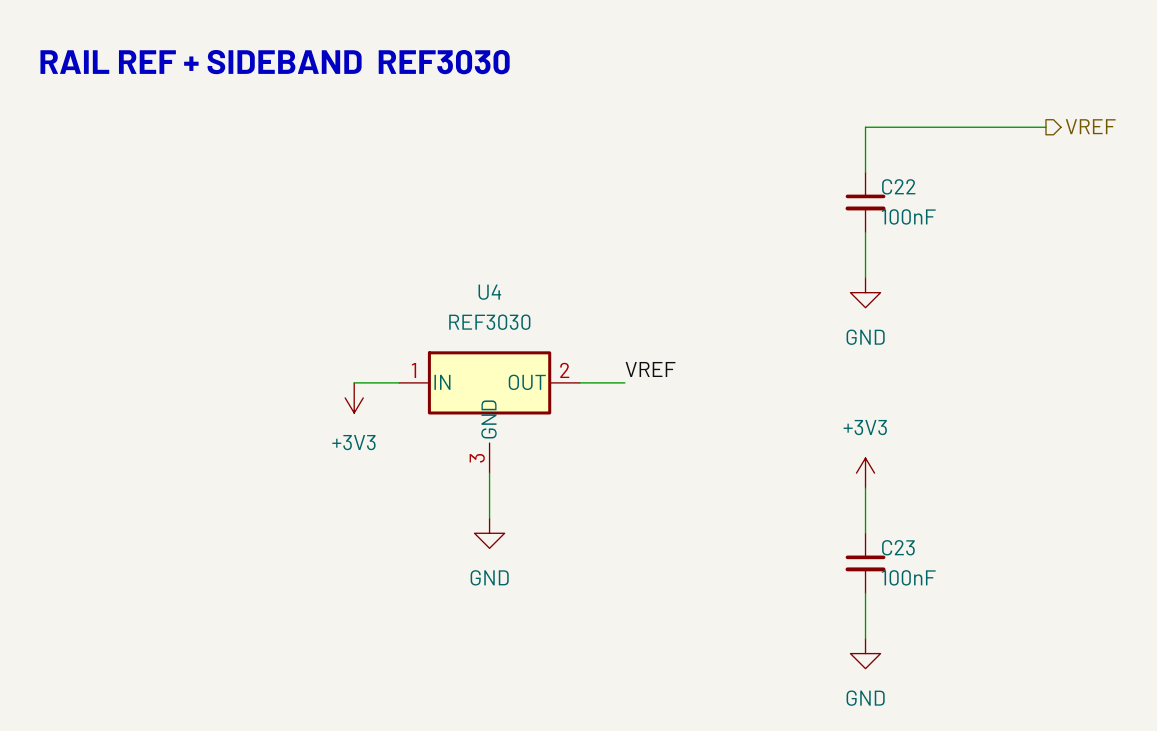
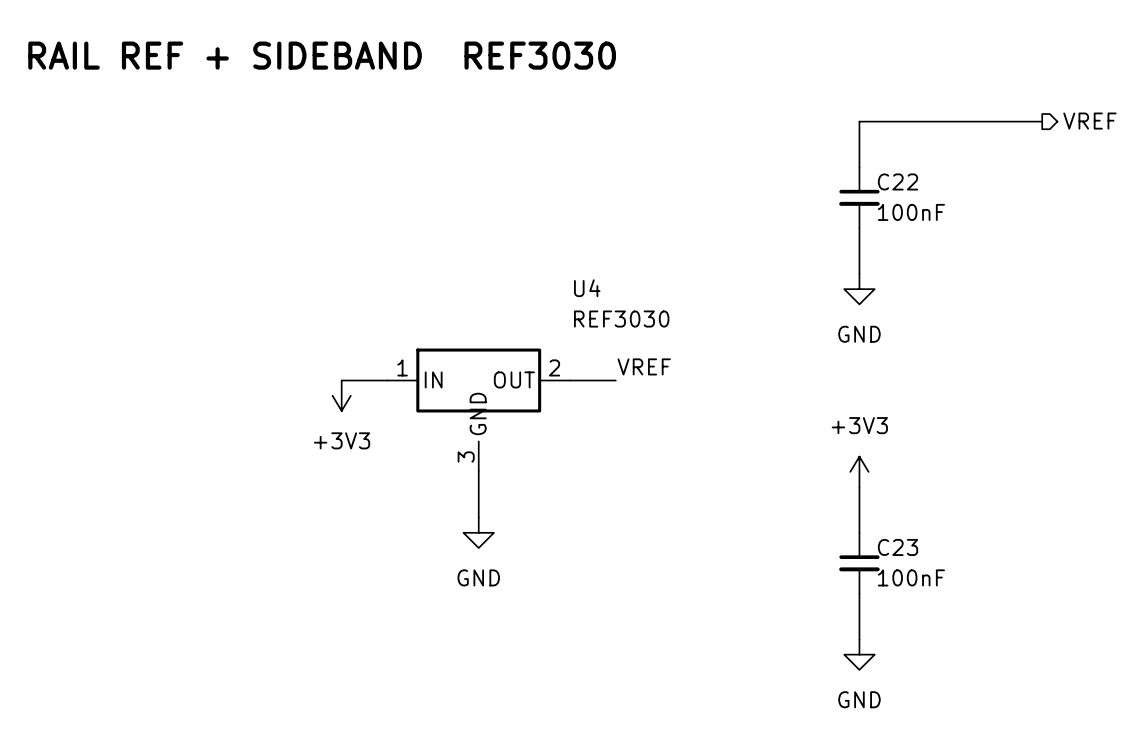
U4 name position: U4 (489, 292) -> U4 (587, 288)
U4 value position: REF3030 (489, 322) -> REF3030 (621, 319)

